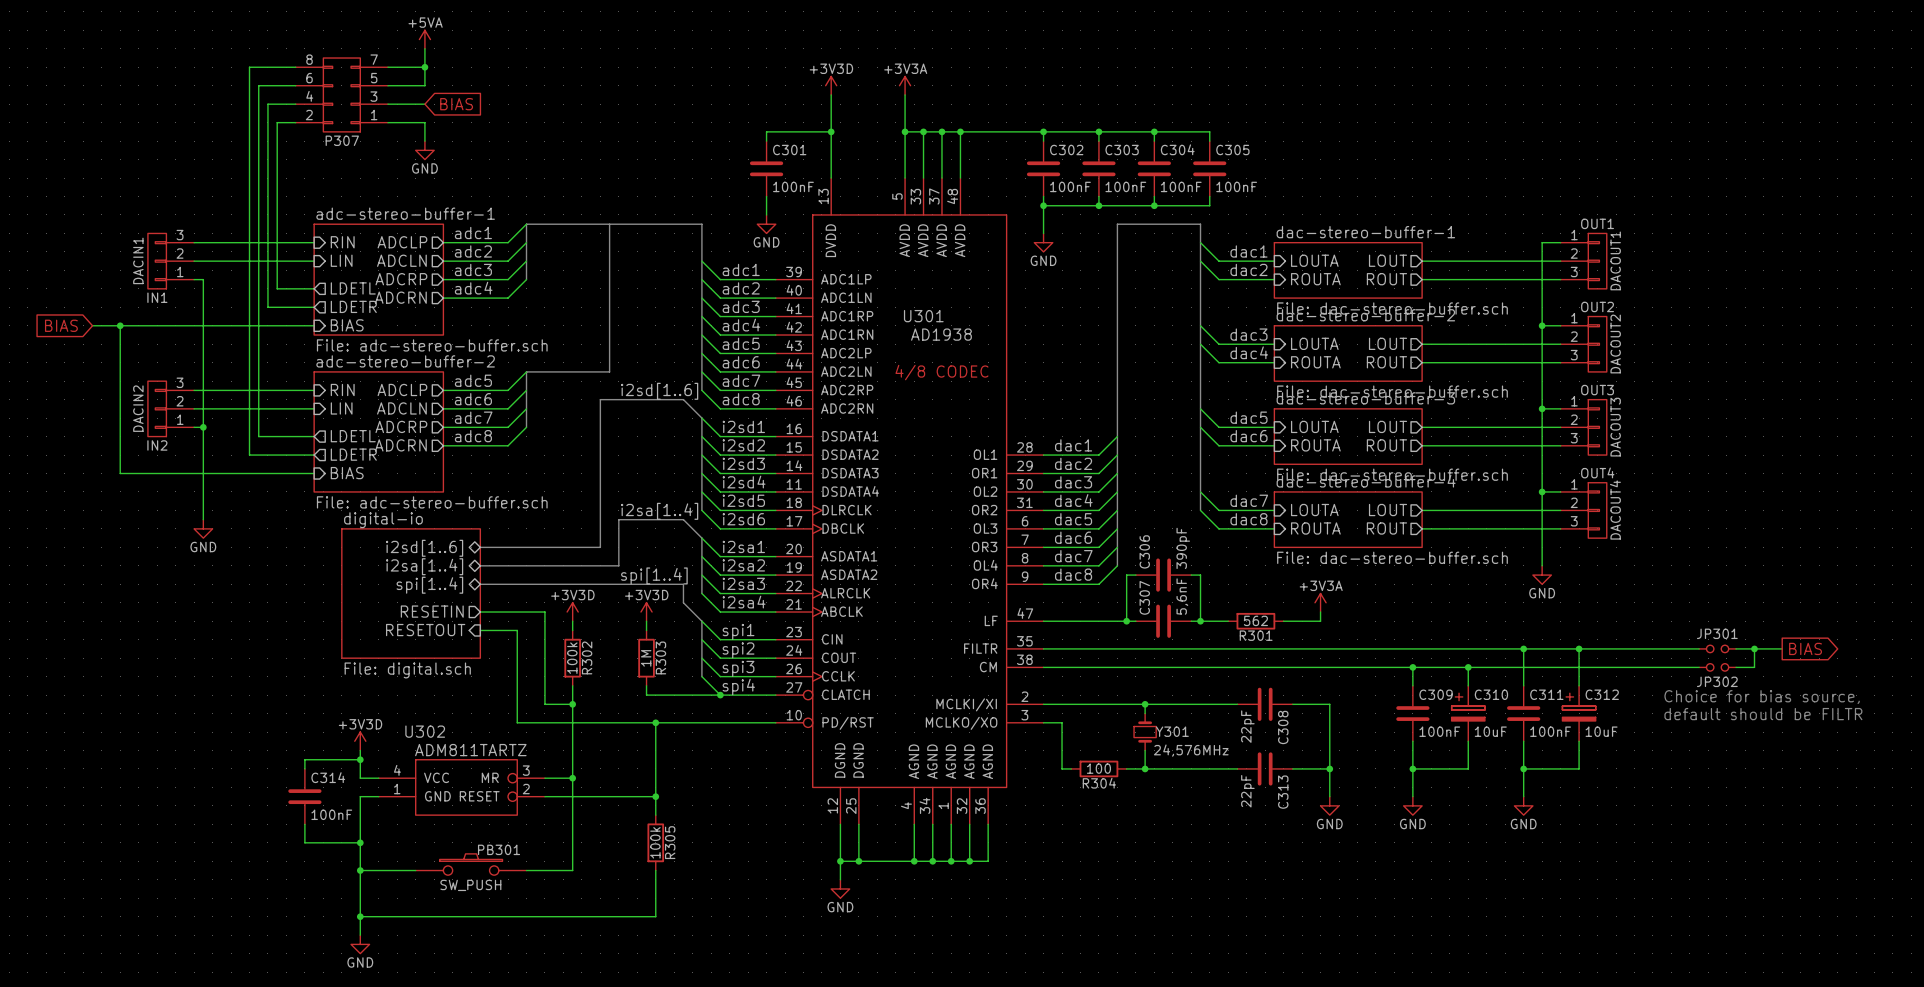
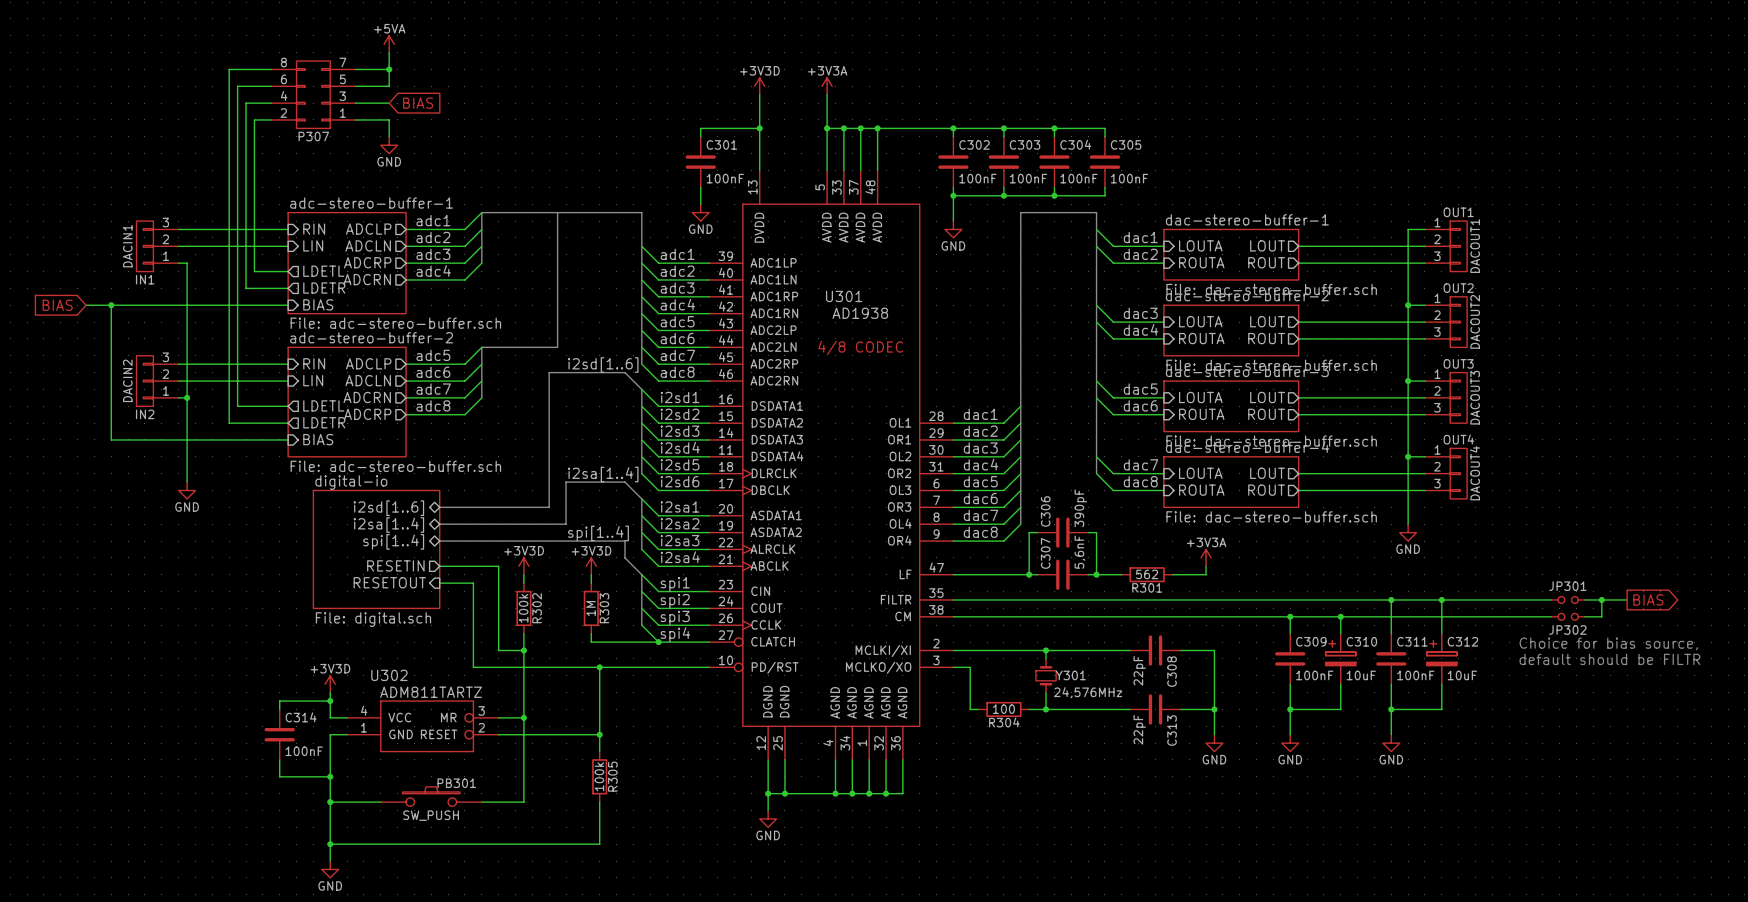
sheet pin: ADCRP (401, 426) -> ADCRN (367, 397)
sheet pin: ADCRN (400, 445) -> ADCRP (367, 414)

